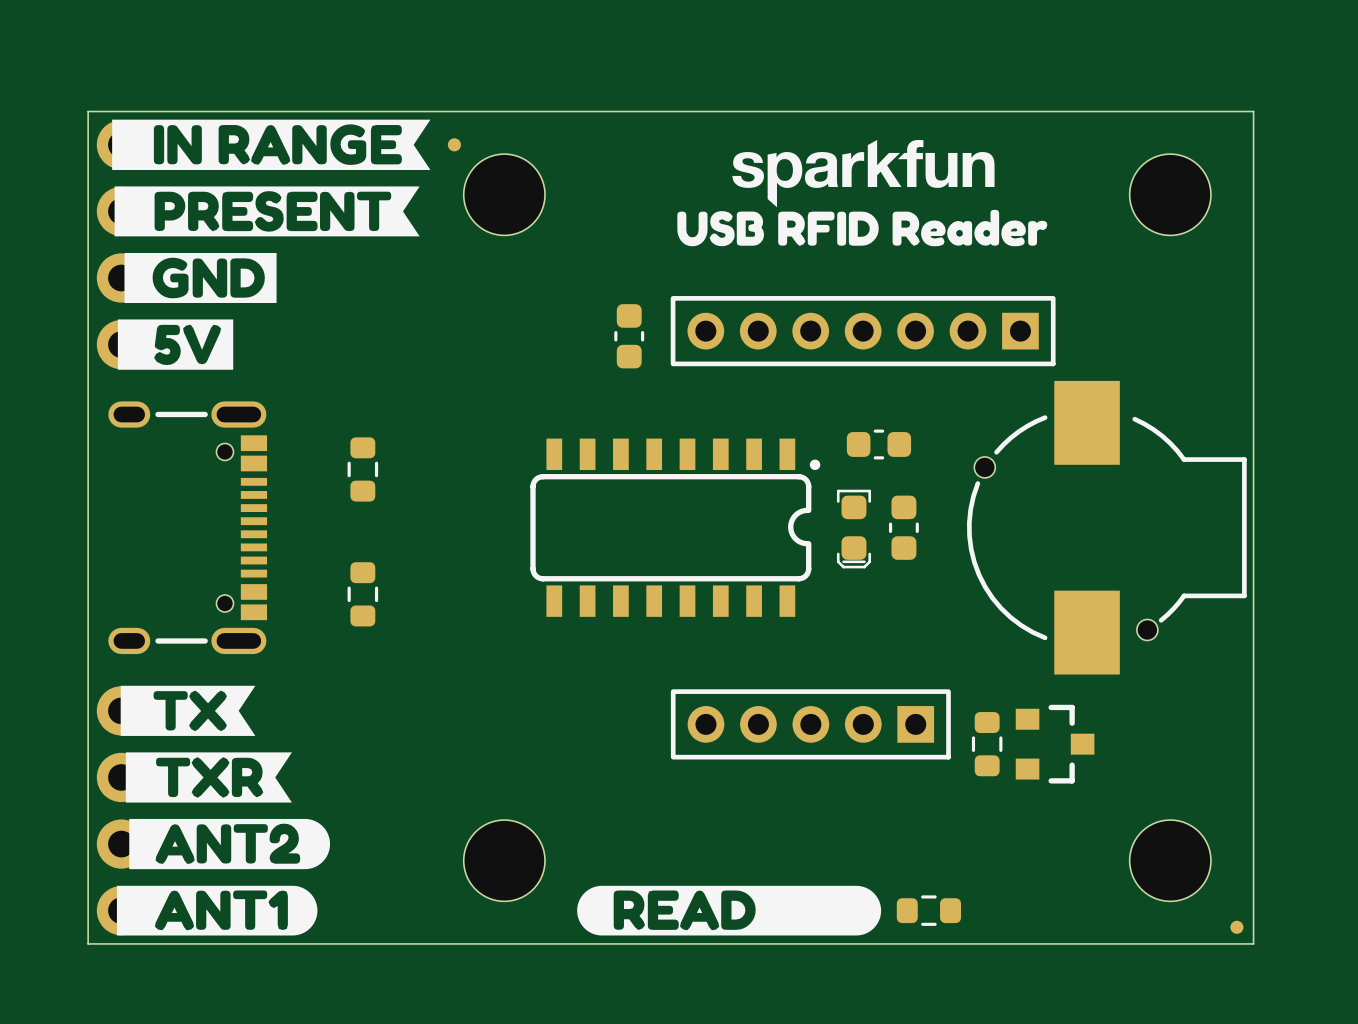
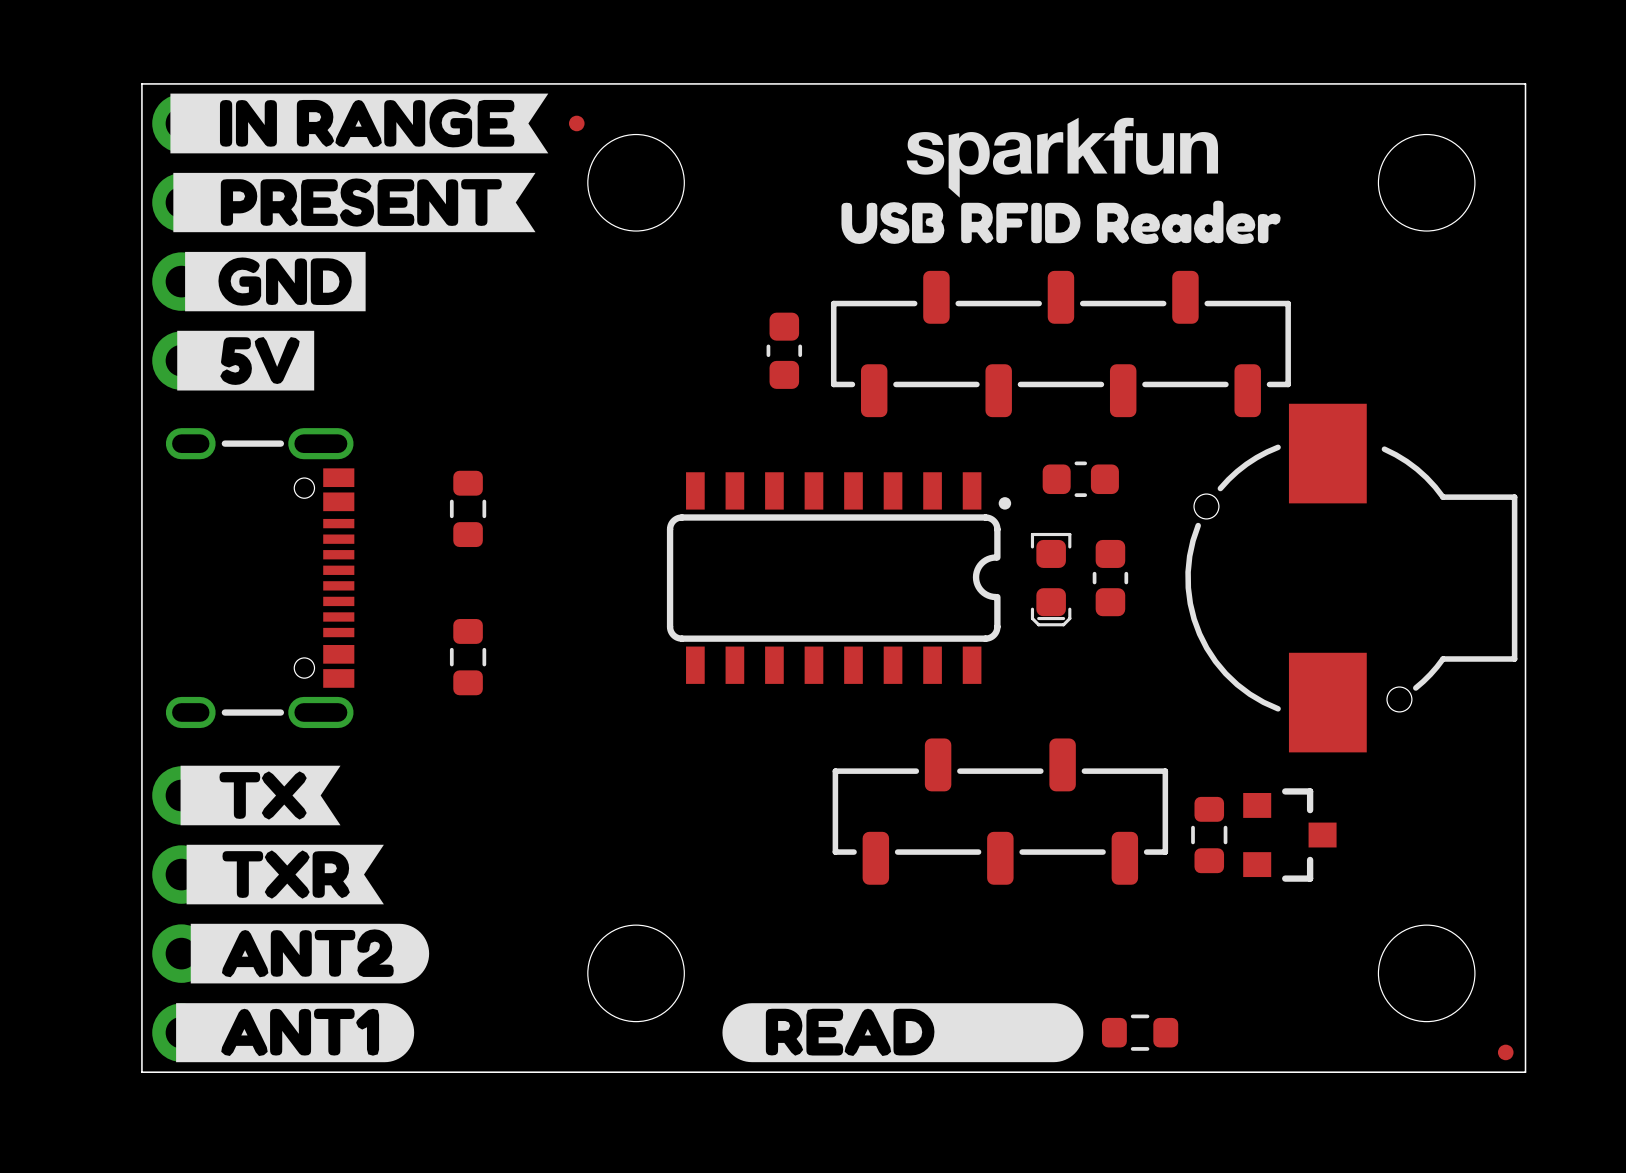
part footprint: [670, 296, 1056, 367] -> [830, 270, 1291, 418]
part footprint: [670, 689, 951, 760] -> [832, 738, 1169, 885]

